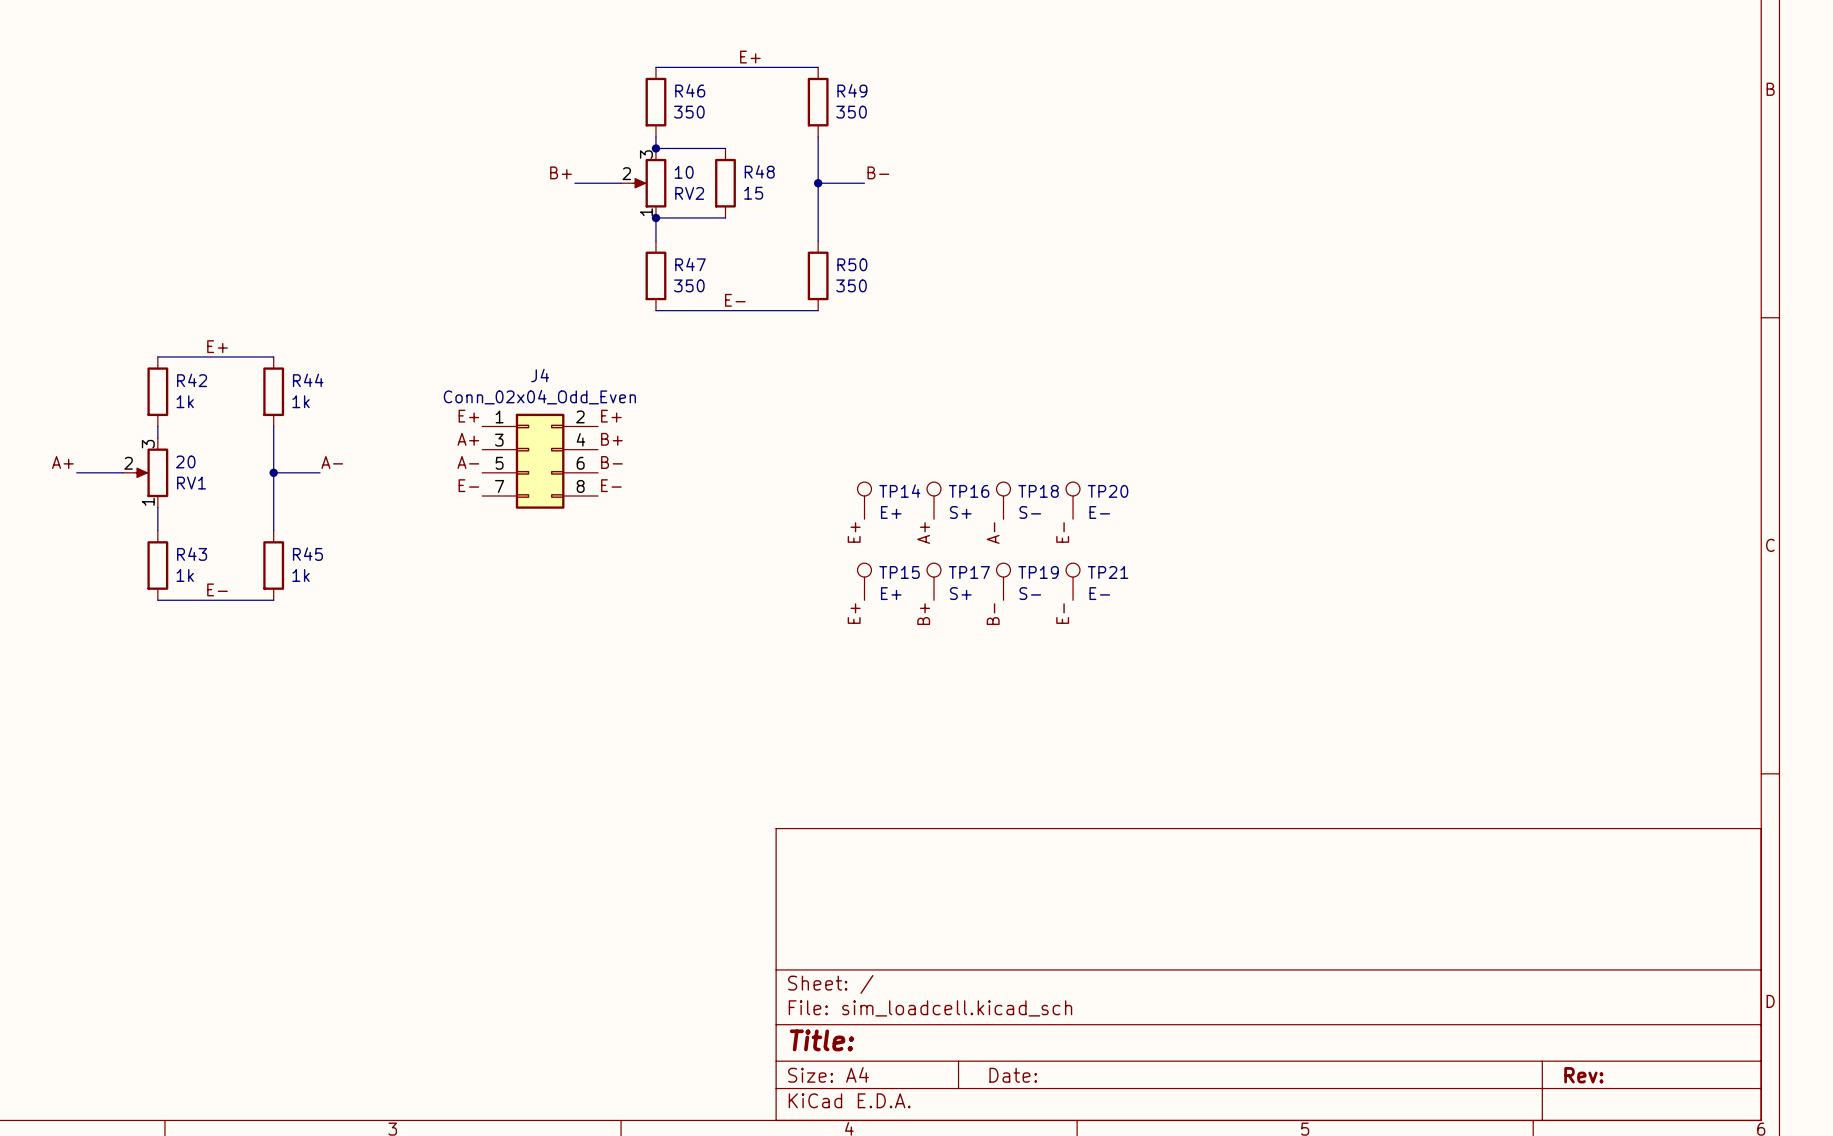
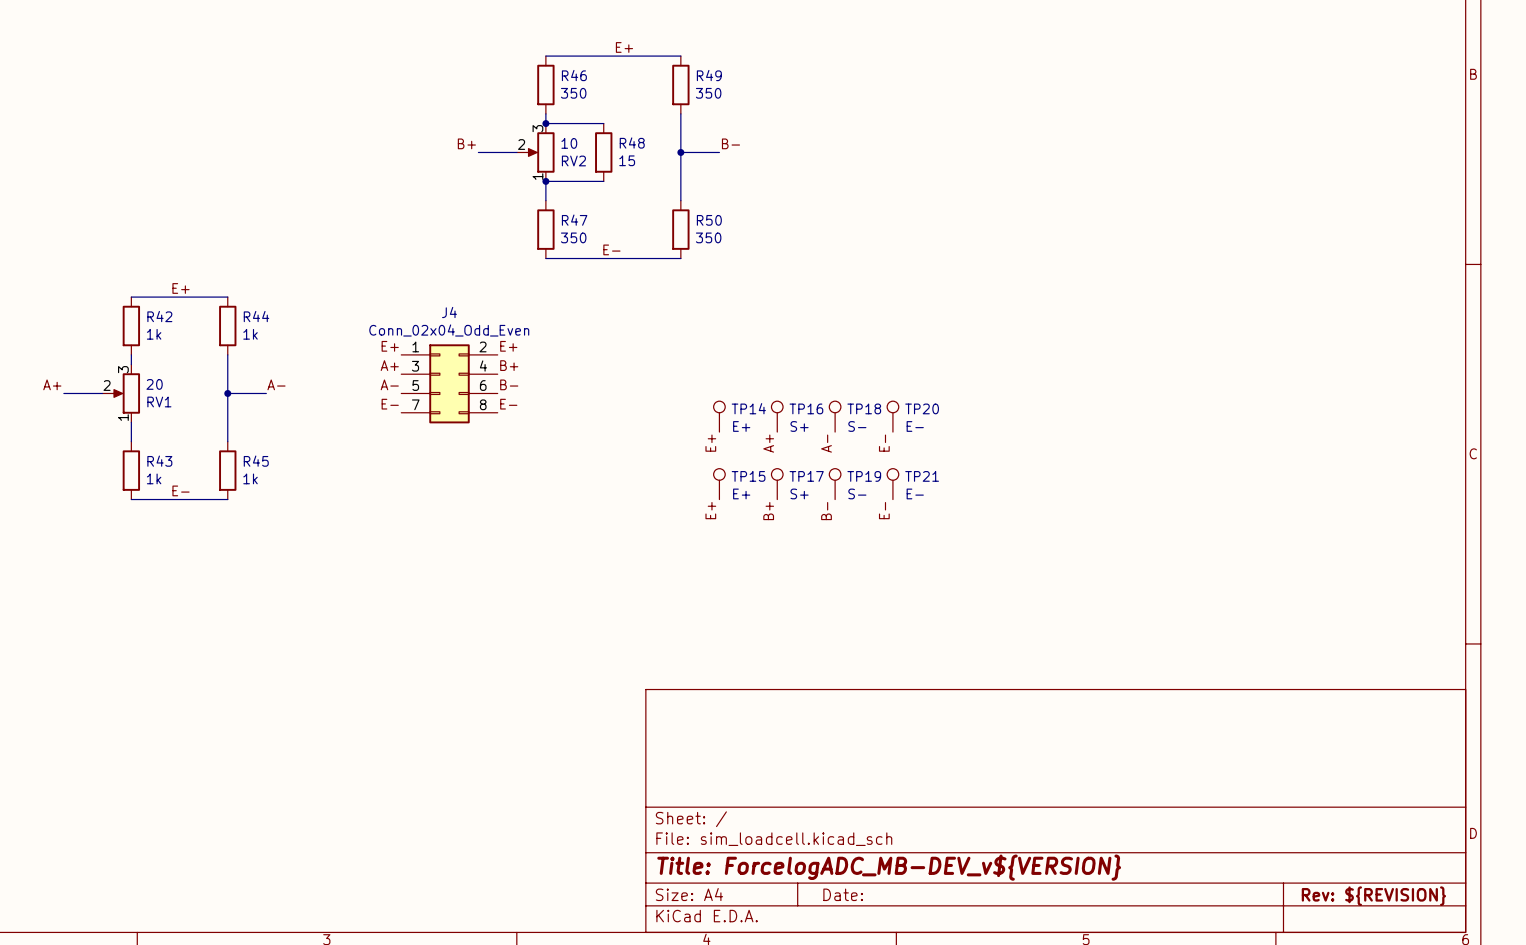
title block: Title: (822, 1040) -> Title: ForcelogADC_MB-DEV_v${VERSION} (889, 867)
title block: Rev: (1583, 1075) -> Rev: ${REVISION} (1373, 896)

